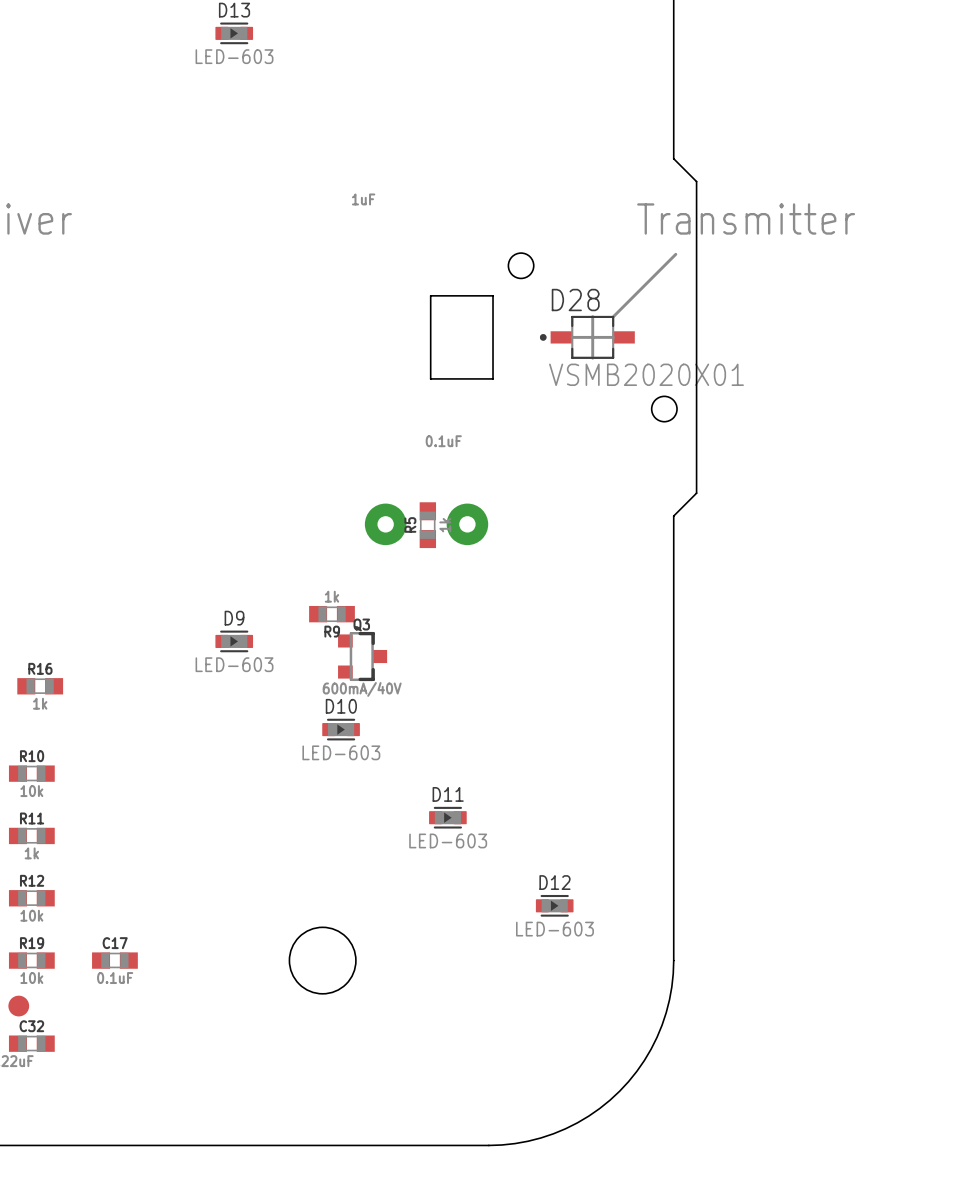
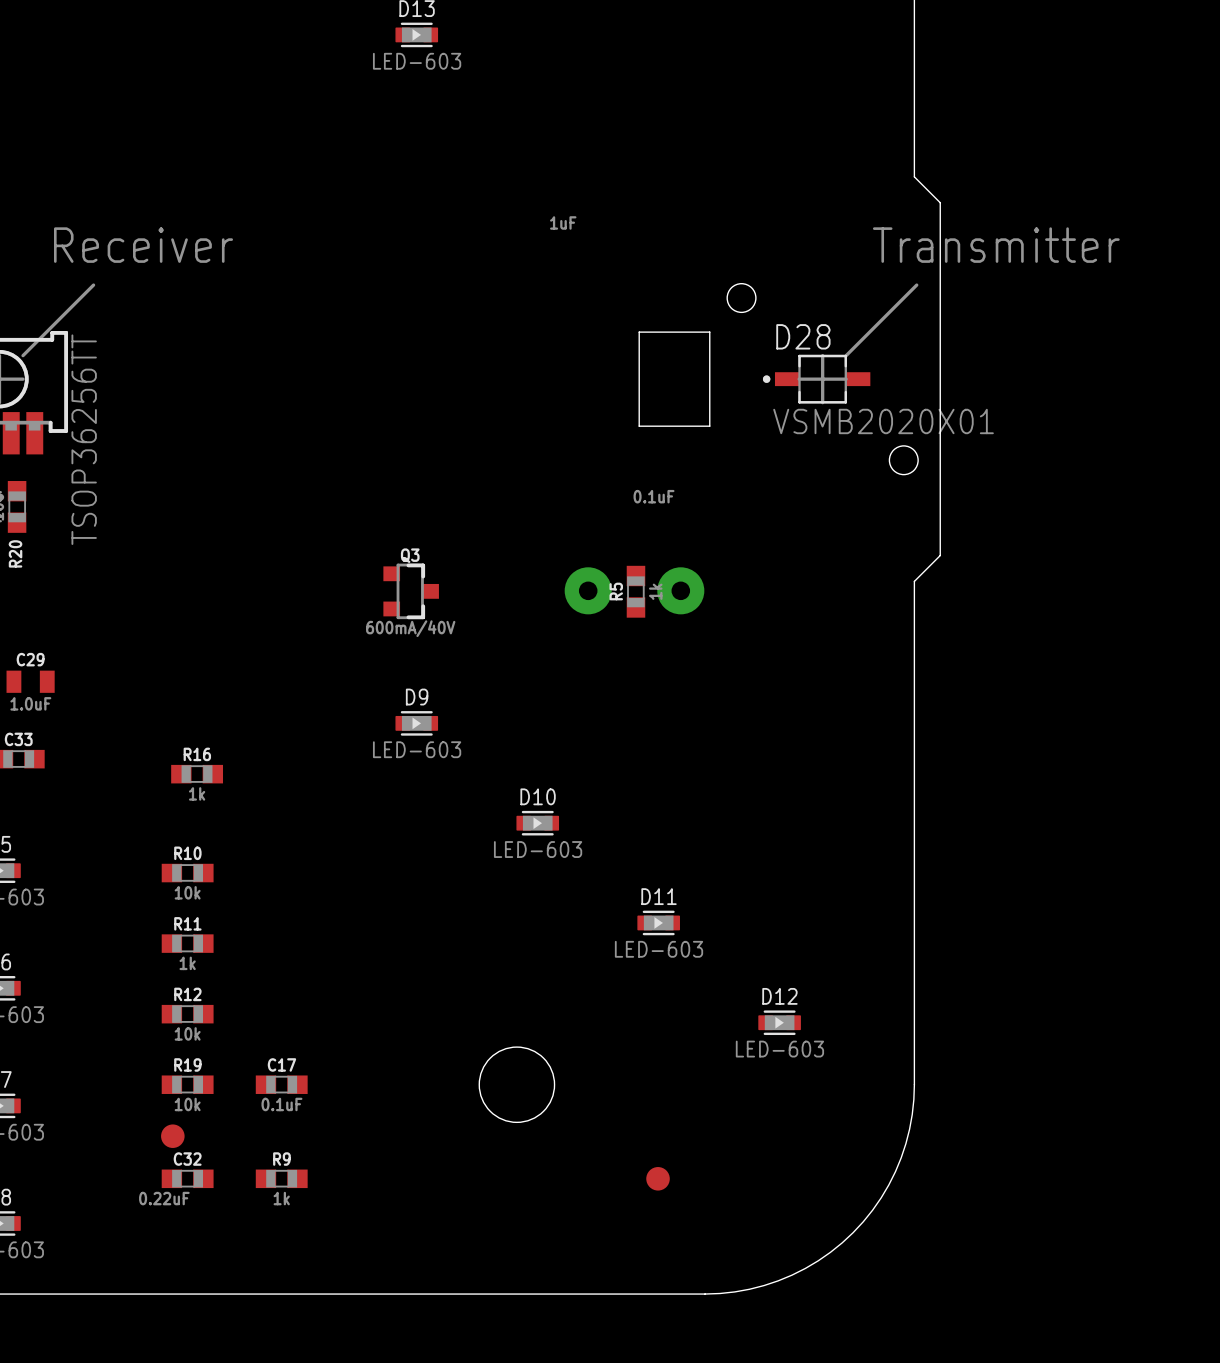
R9 value position: 1k (331, 596) -> 1k (281, 1198)
R9 position: (331, 614) -> (281, 1178)
R9 name position: R9 (332, 631) -> R9 (281, 1159)
Q3 position: (362, 656) -> (411, 591)
part: none -> (658, 1178)

